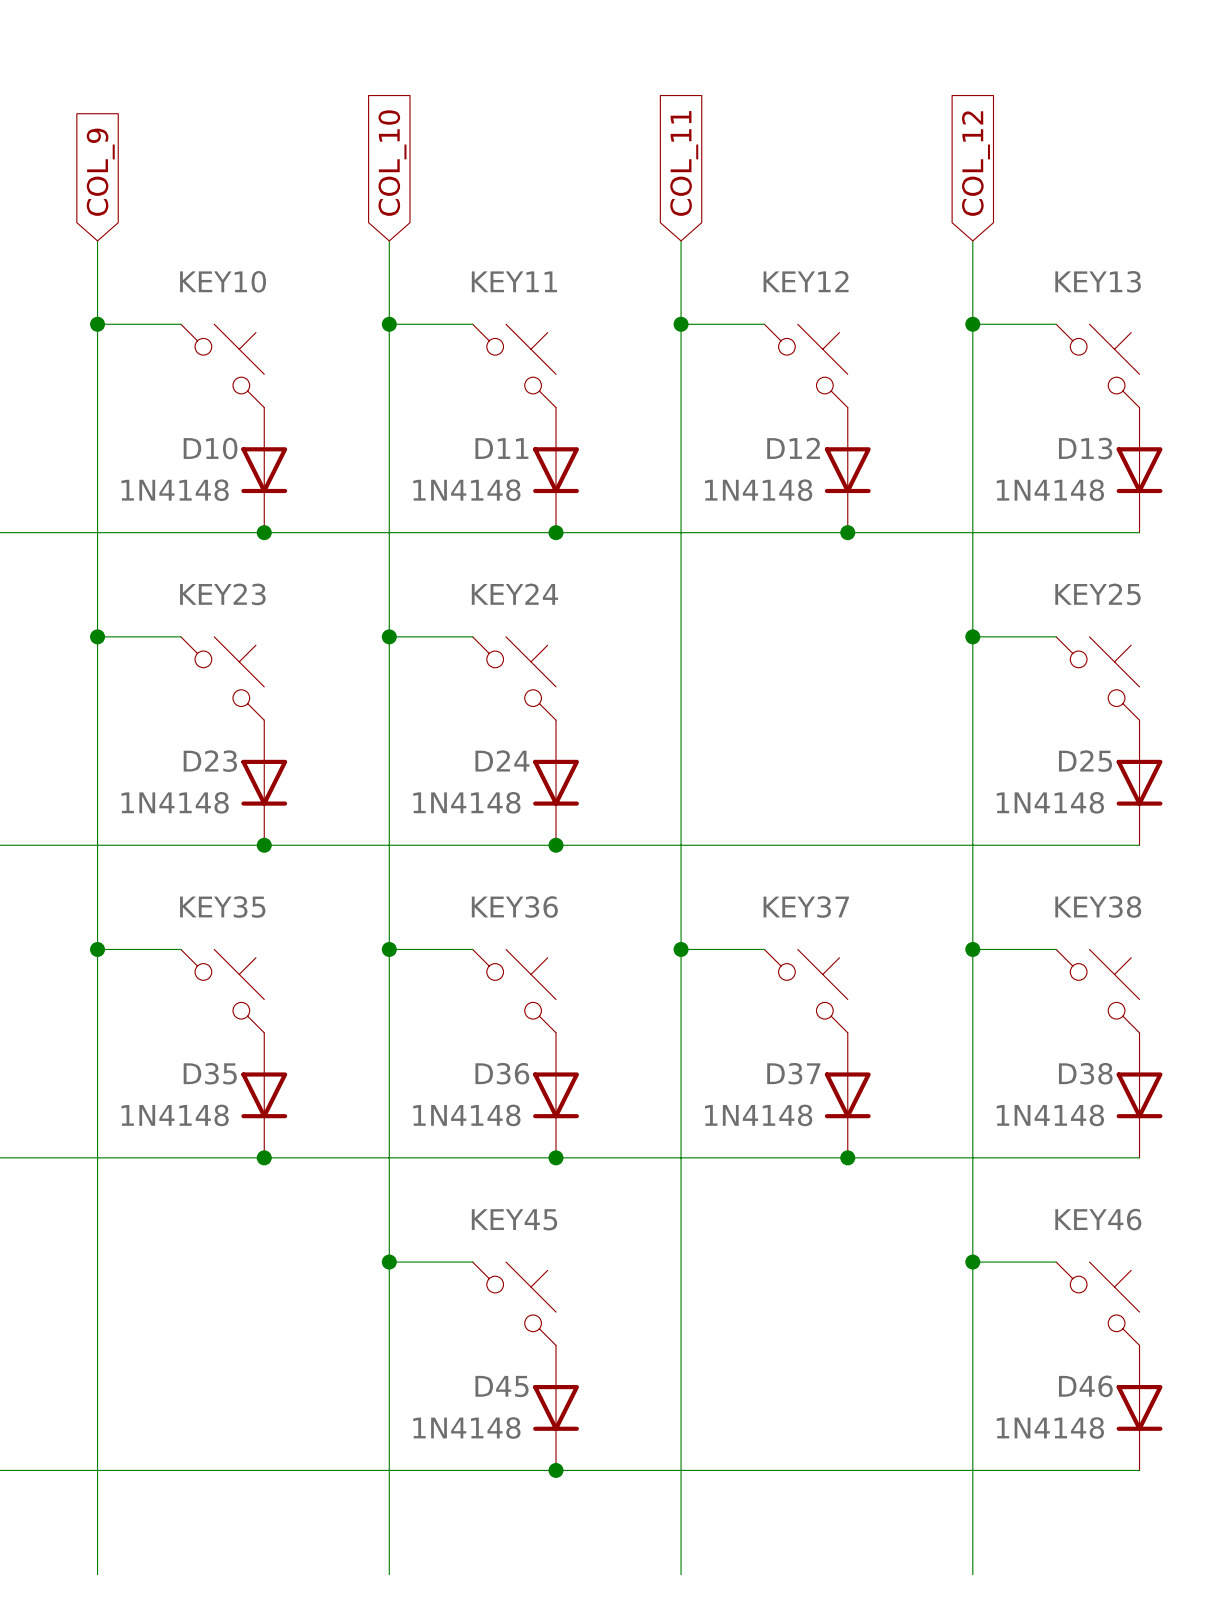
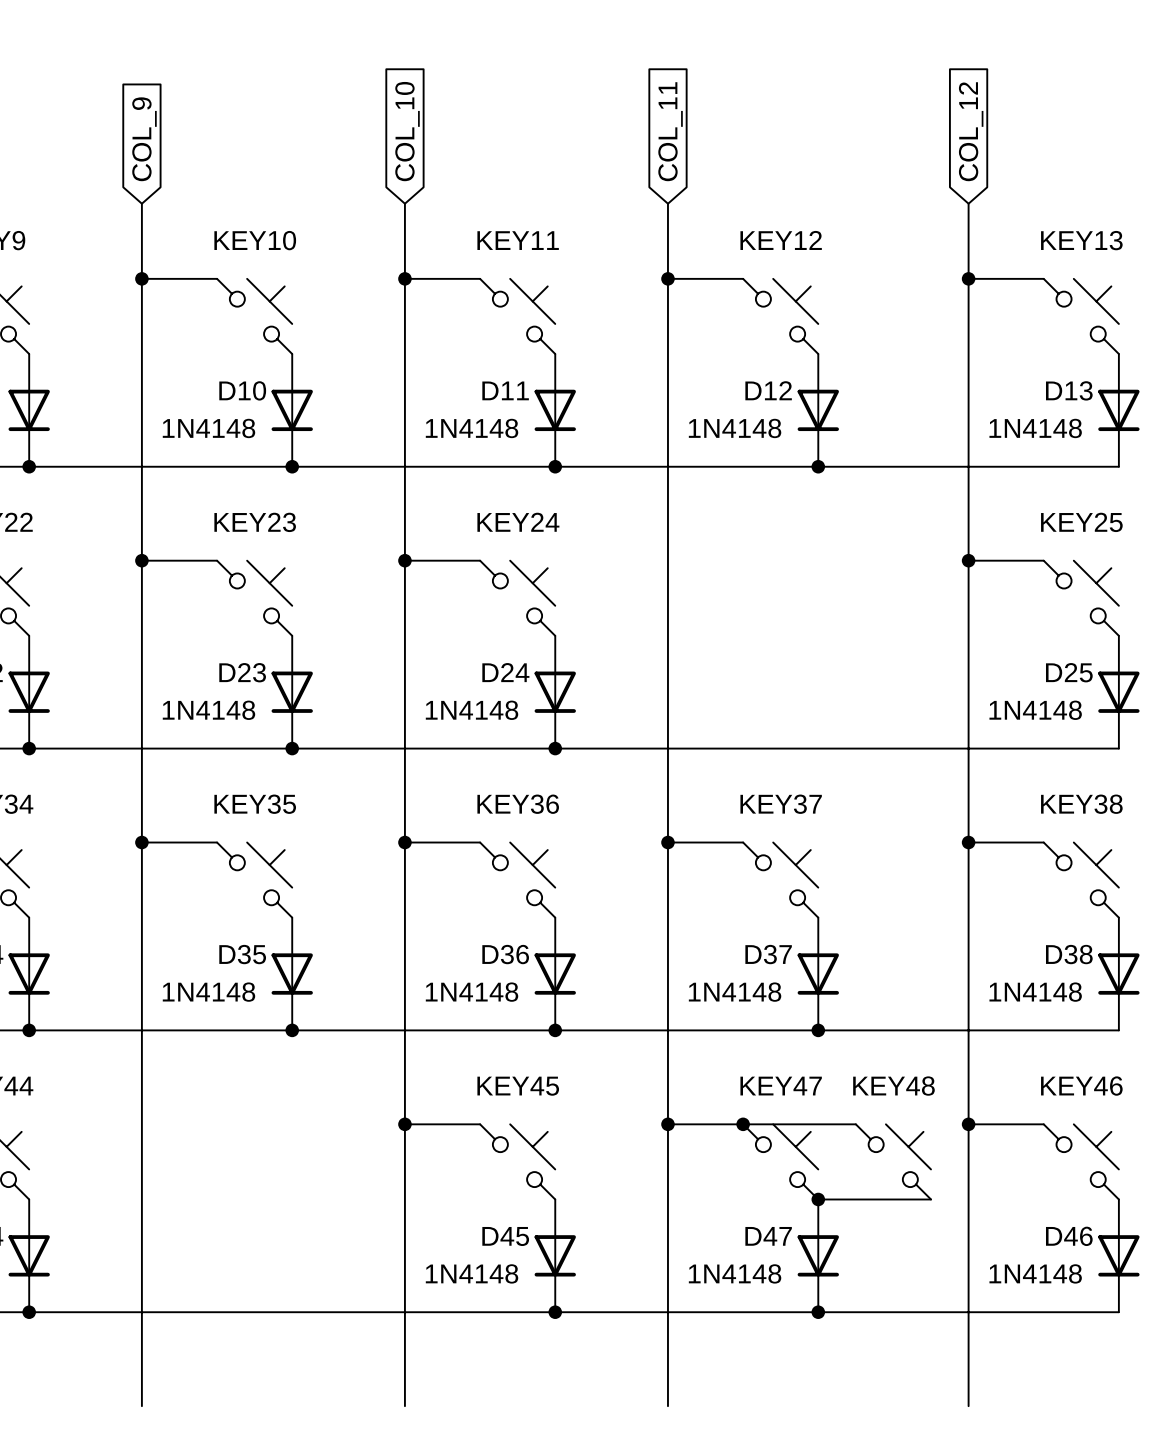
global label position: COL_12 (975, 163) -> COL_12 (971, 131)
wire: (972, 240) (972, 1574) -> (968, 203) (968, 1406)
wire: (972, 324) (1014, 324) -> (1006, 278) (1043, 278)
junction position: (972, 324) -> (968, 278)
KEY13 position: (1097, 365) -> (1081, 316)
D13 position: (1139, 470) -> (1118, 410)
wire: none -> (1081, 466) (1118, 466)
wire: (972, 636) (1014, 636) -> (1006, 560) (1043, 560)
junction position: (972, 636) -> (968, 560)
KEY25 position: (1097, 678) -> (1081, 598)
D25 position: (1139, 782) -> (1118, 692)
wire: none -> (1081, 748) (1118, 748)
wire: (972, 949) (1014, 949) -> (1006, 842) (1043, 842)
junction position: (972, 949) -> (968, 842)
KEY38 position: (1097, 991) -> (1081, 880)
D38 position: (1139, 1095) -> (1118, 974)
wire: none -> (1081, 1030) (1118, 1030)
wire: none -> (667, 1124) (855, 1124)
junction: none -> (667, 1124)
junction: none -> (743, 1124)
wire: (972, 1262) (1014, 1262) -> (1006, 1124) (1043, 1124)
junction position: (972, 1262) -> (968, 1124)
KEY47: none -> (780, 1161)
KEY48: none -> (893, 1161)
KEY46 position: (1097, 1303) -> (1081, 1161)
wire: none -> (818, 1199) (931, 1199)
junction: none -> (818, 1199)
D47: none -> 1N4148 (818, 1255)
D46 position: (1139, 1407) -> (1118, 1255)
junction: none -> (818, 1312)
wire: none -> (1081, 1312) (1118, 1312)

